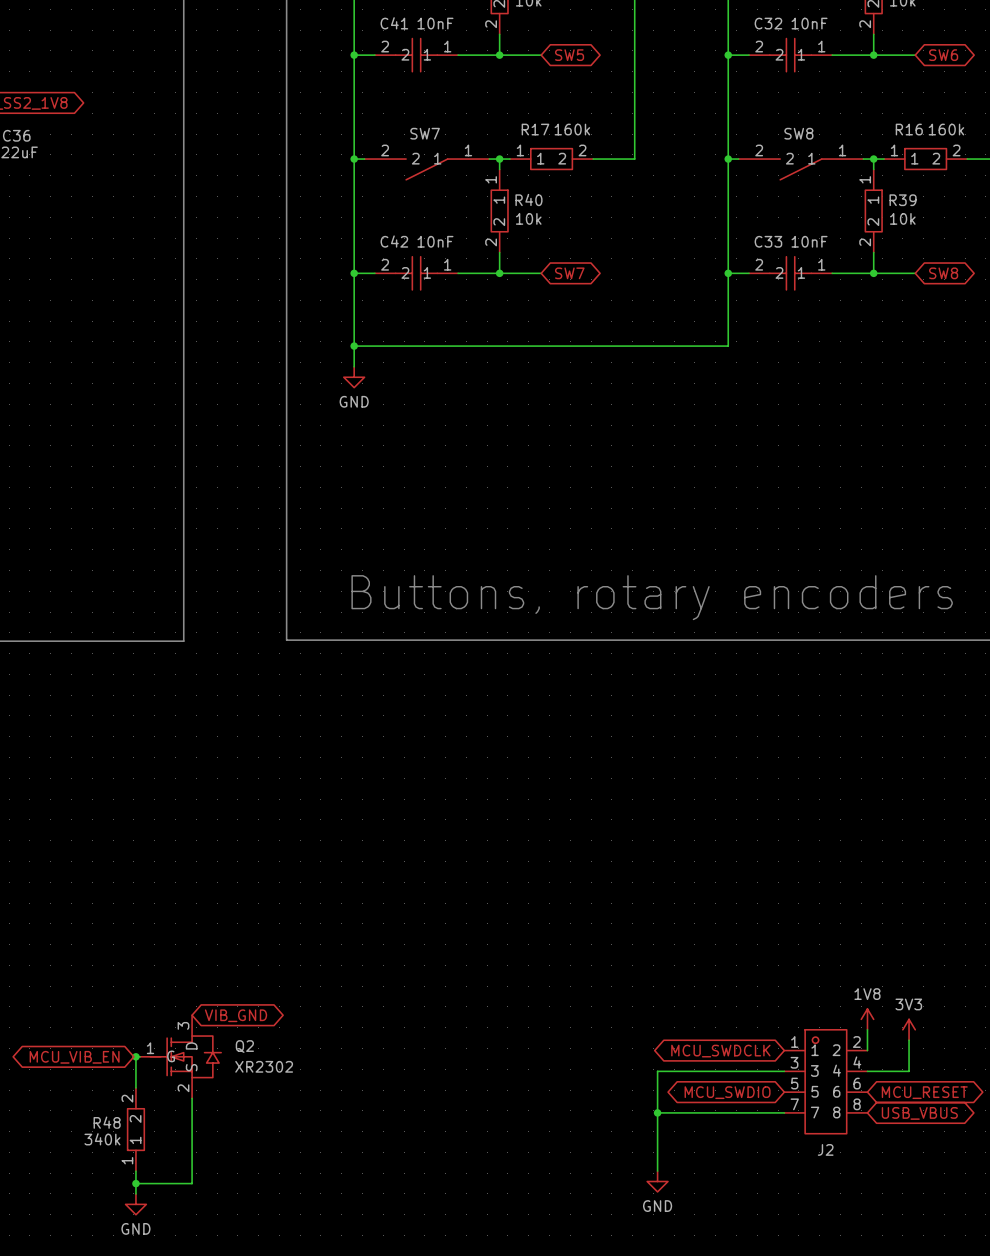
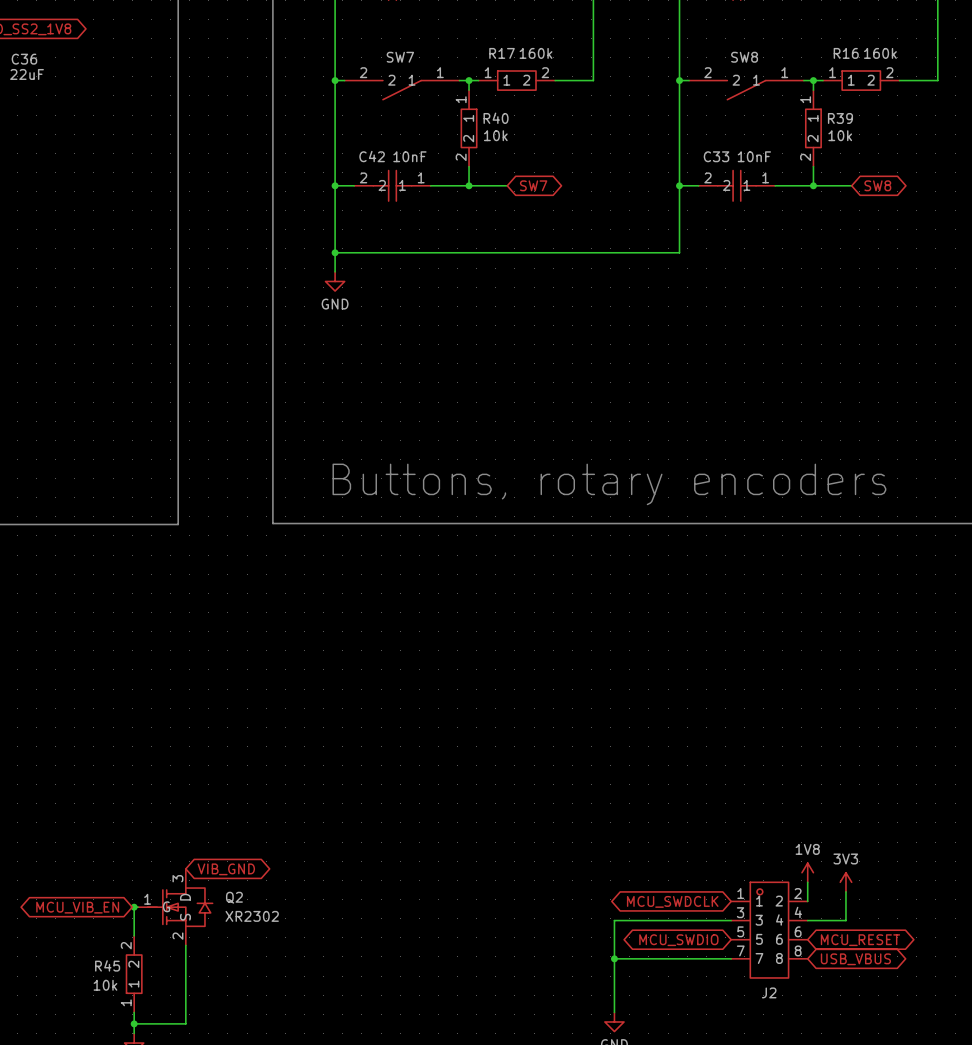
R48 name: R48 (107, 1122) -> R45 (107, 965)
R48 text: 340k (102, 1139) -> 10k (105, 985)

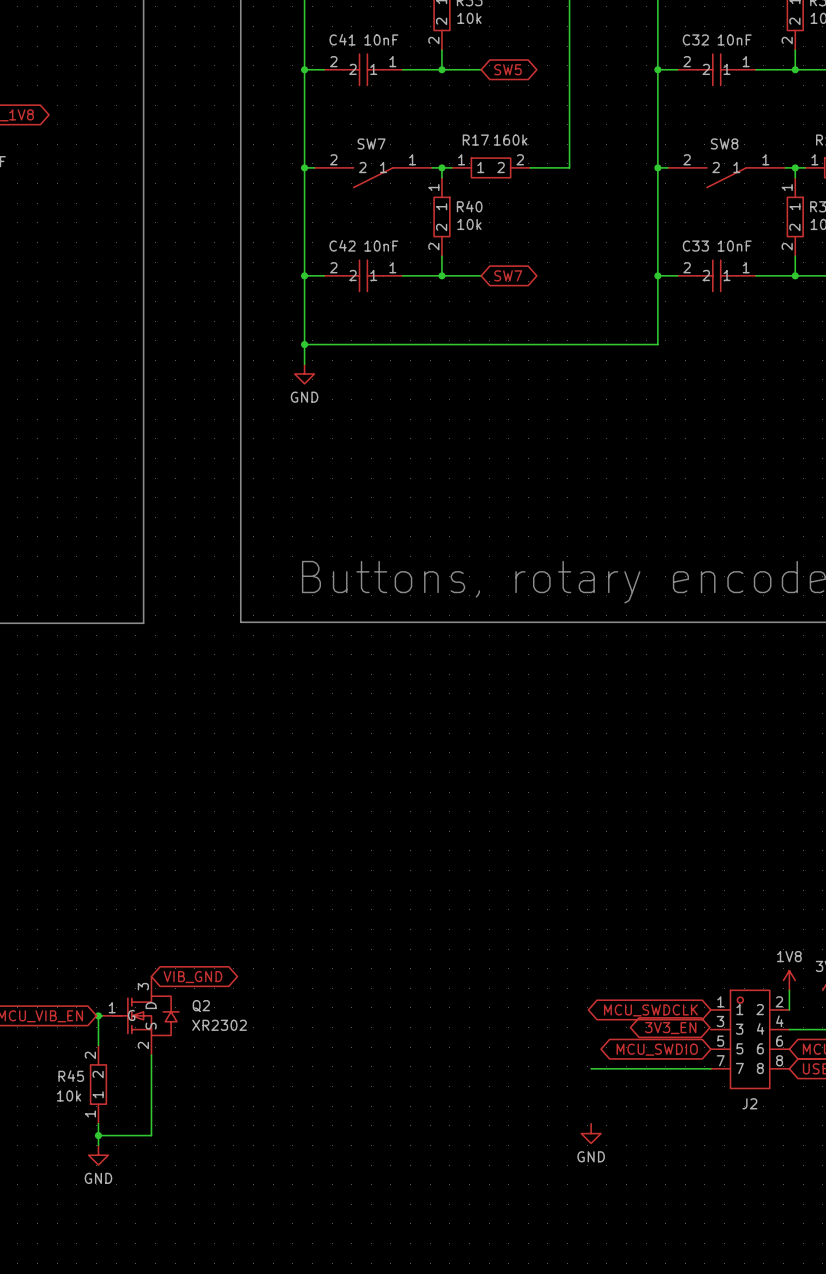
global label: none -> 3V3_EN (670, 1028)
wire: (731, 920) (614, 920) (614, 1012) -> none
junction: (614, 958) -> none

